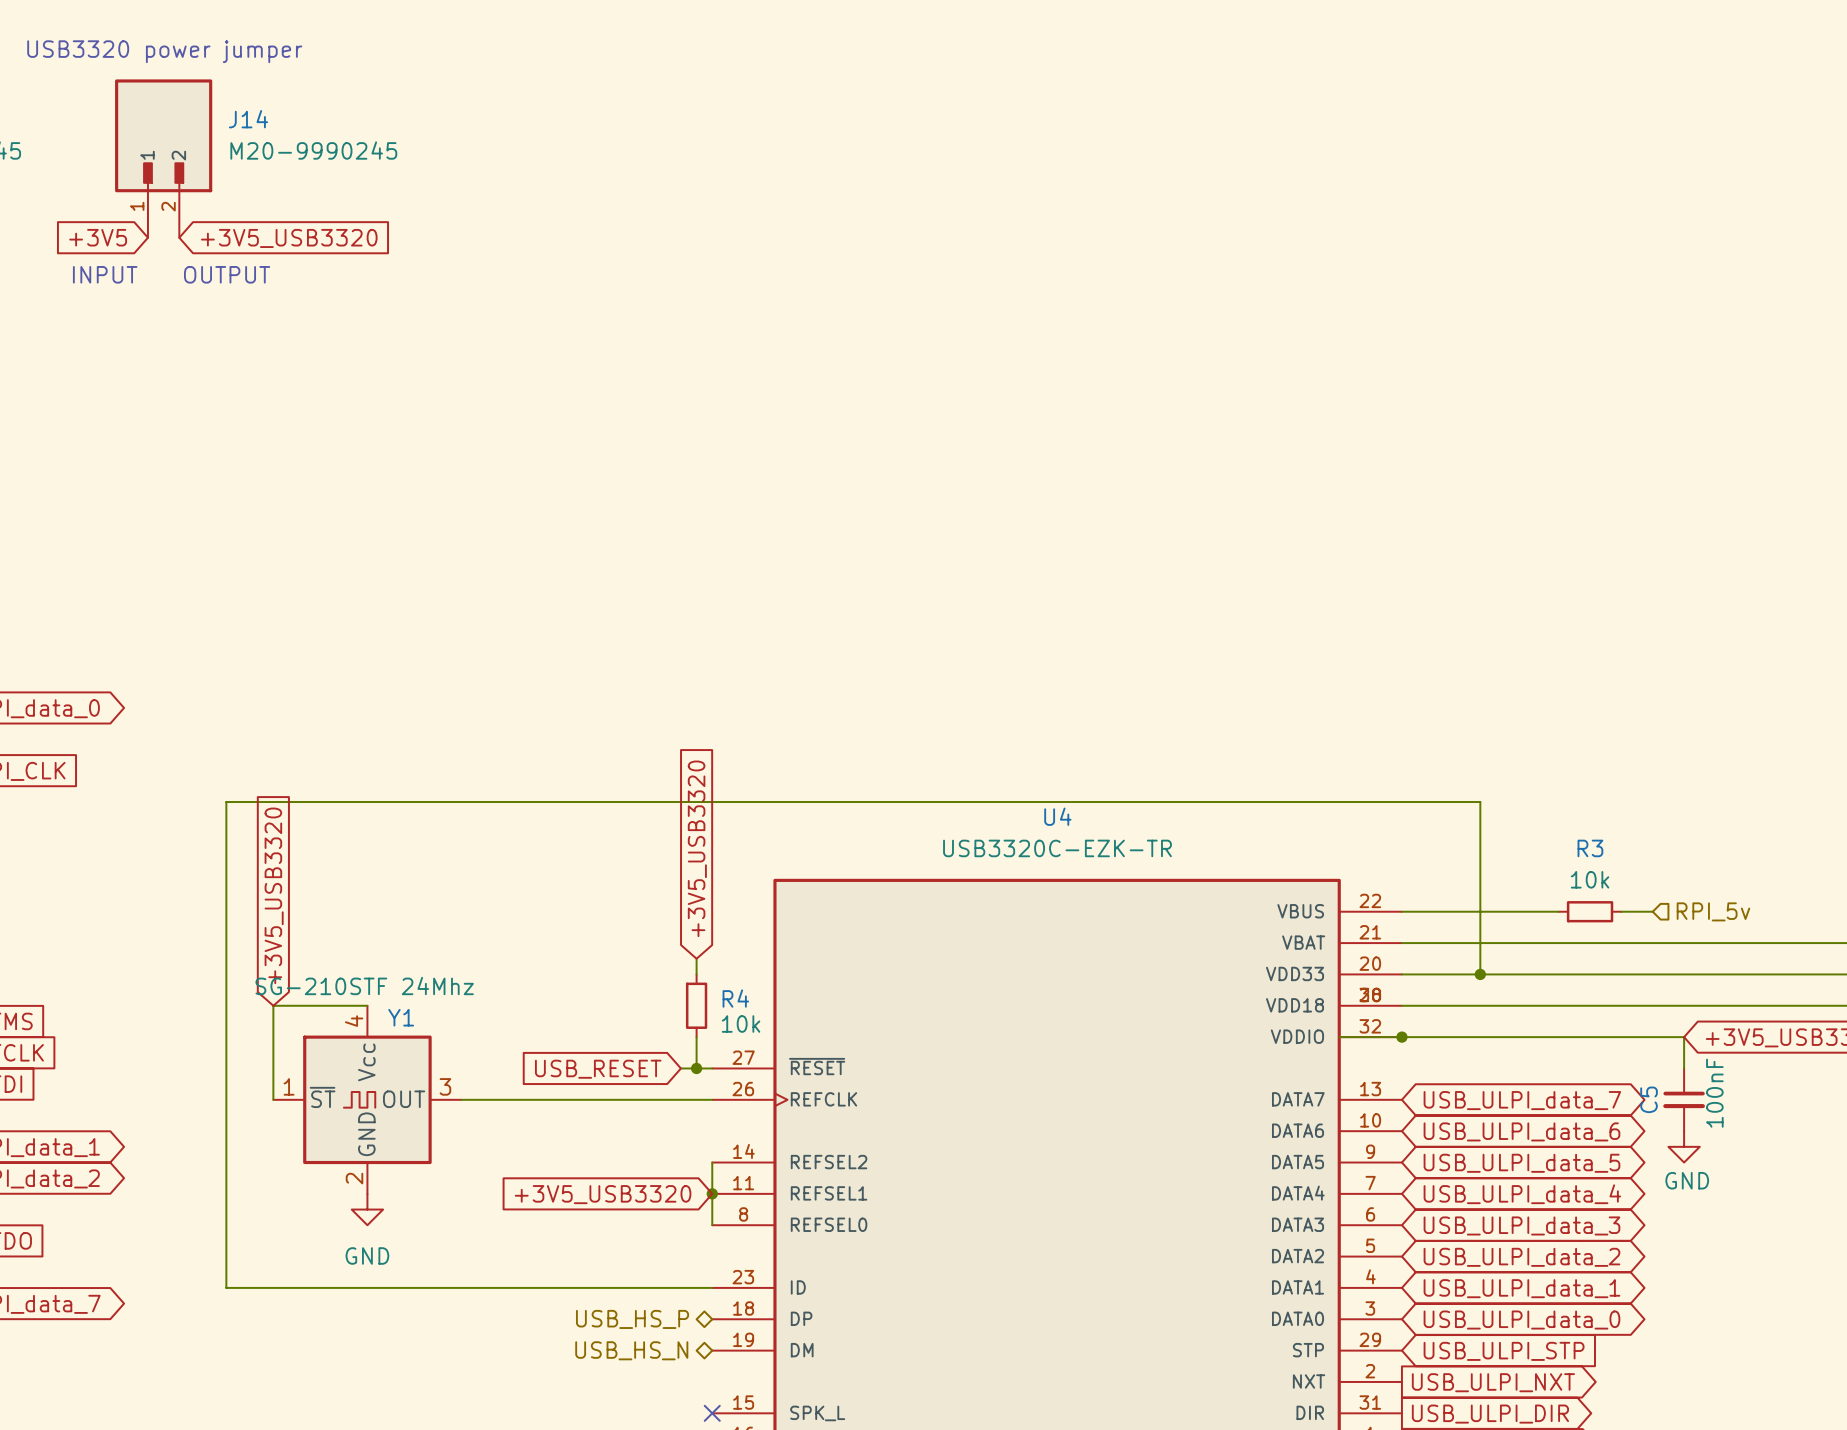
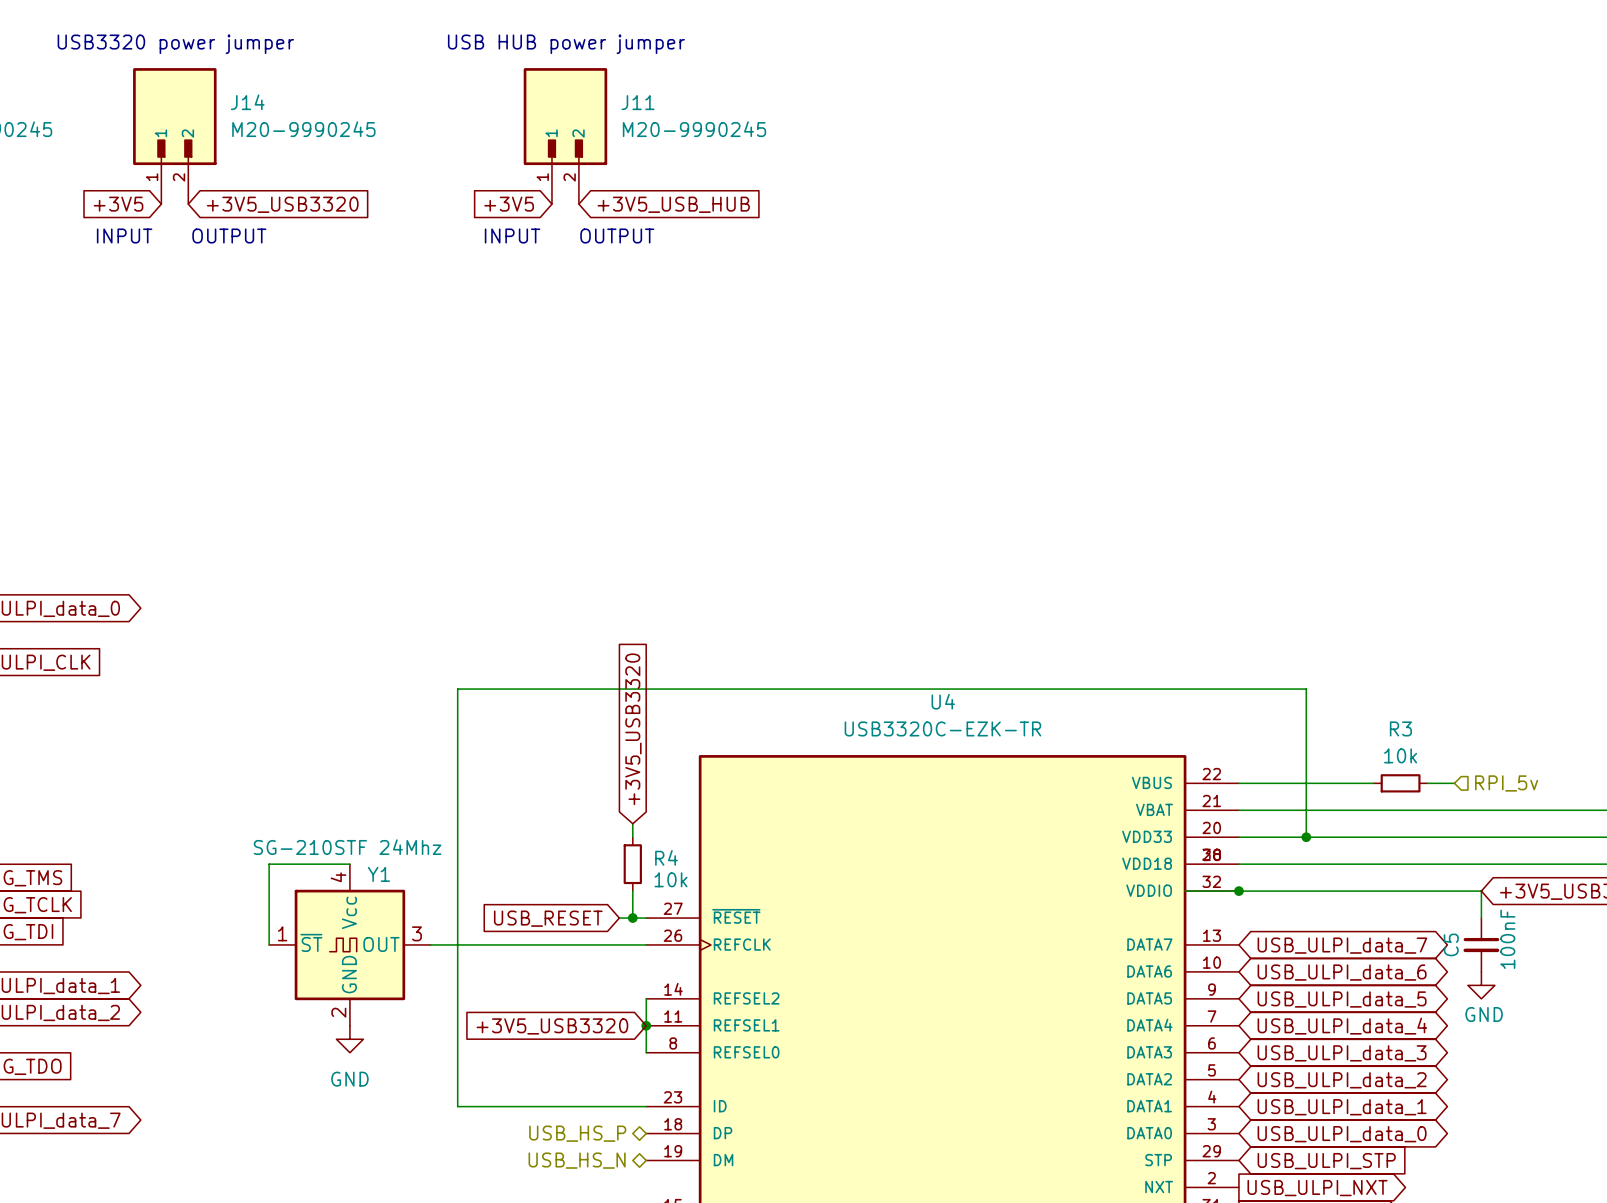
text: none -> USB HUB power jumper (566, 44)
J11: none -> M20-9990245 (565, 136)
global label: none -> +3V5 (509, 204)
global label: none -> +3V5_USB_HUB (673, 204)
text: none -> INPUT (512, 235)
text: none -> OUTPUT (617, 235)
wire: (492, 802) (226, 802) (226, 1287) (492, 1287) -> (457, 689) (457, 1106)
global label: +3V5_USB3320 (274, 895) -> none

